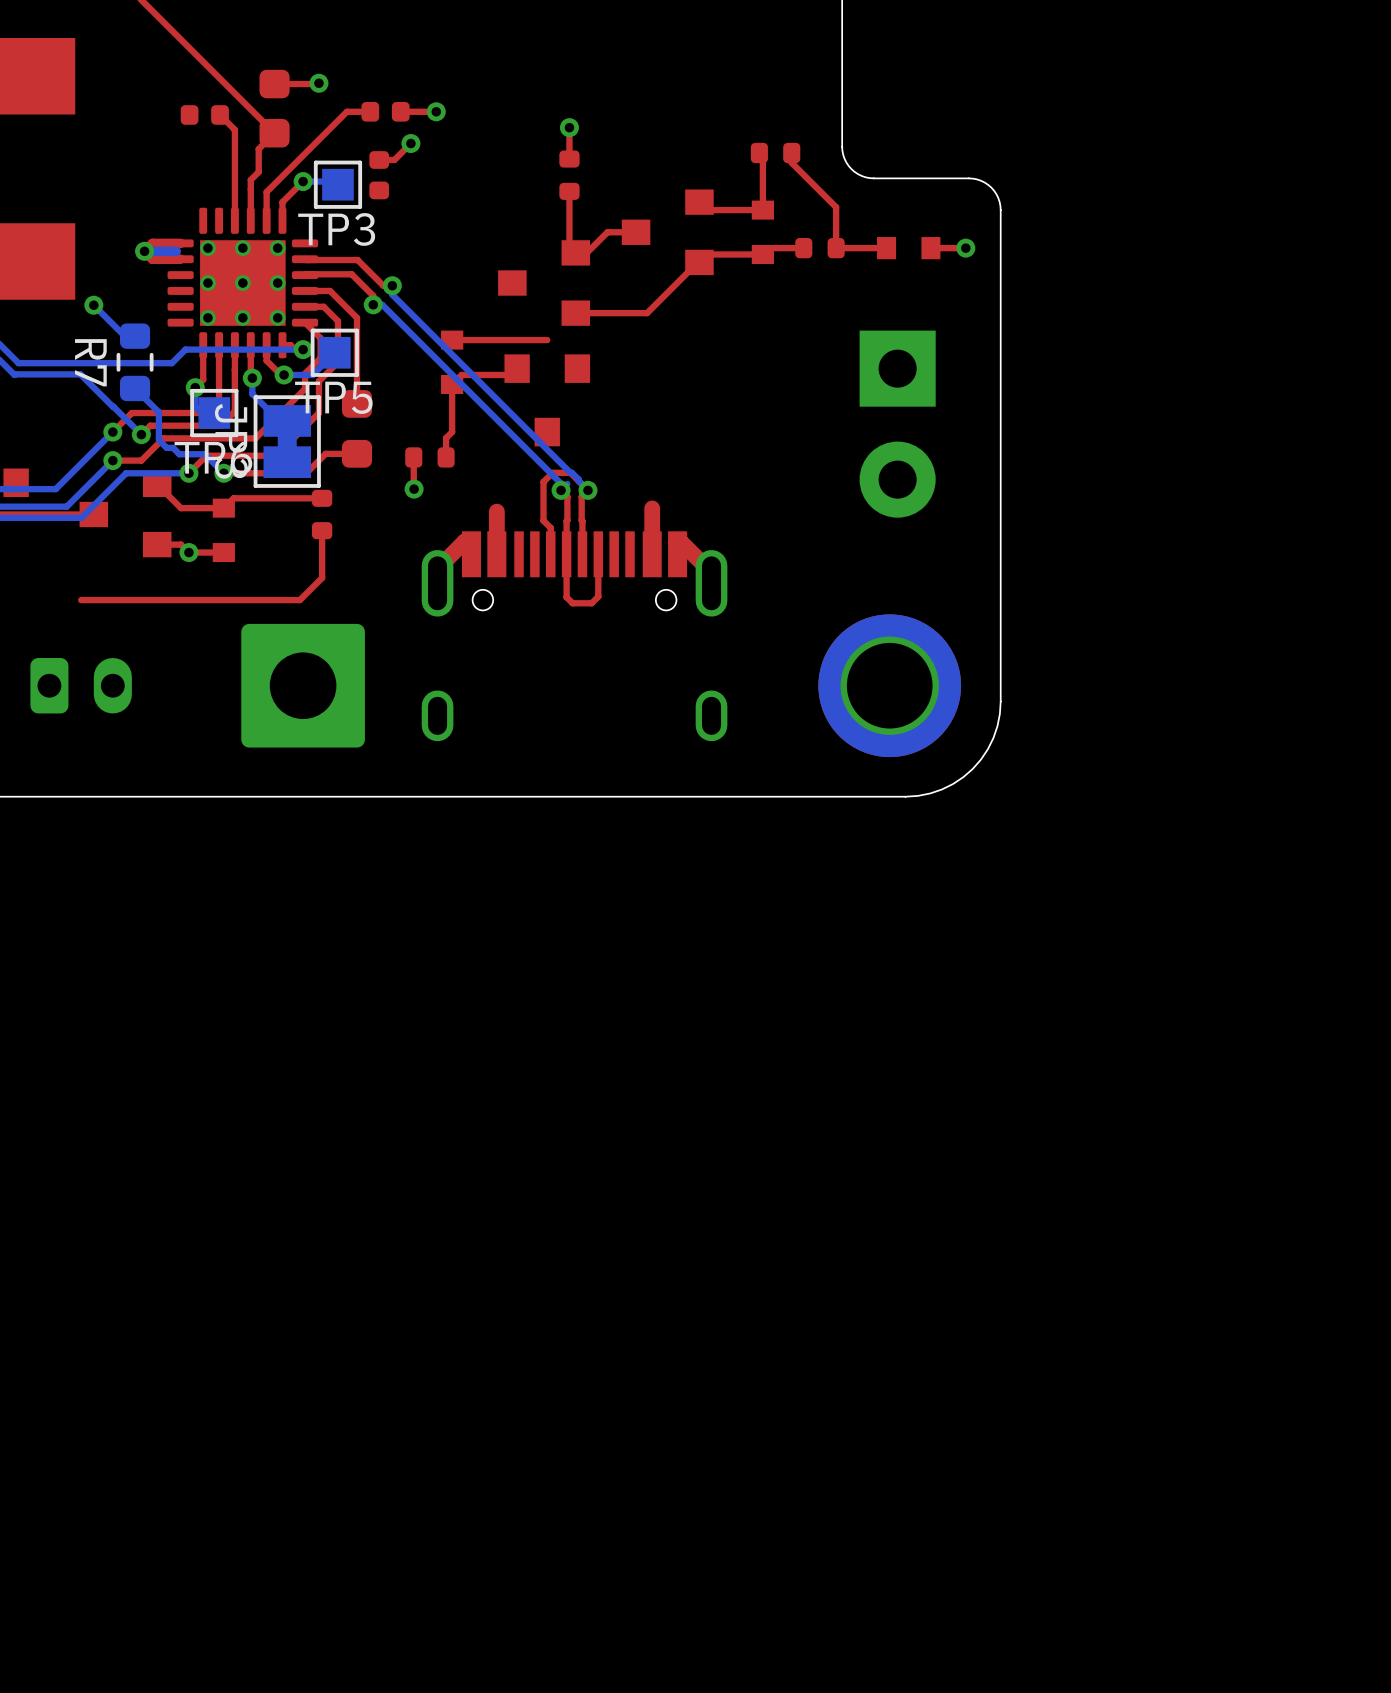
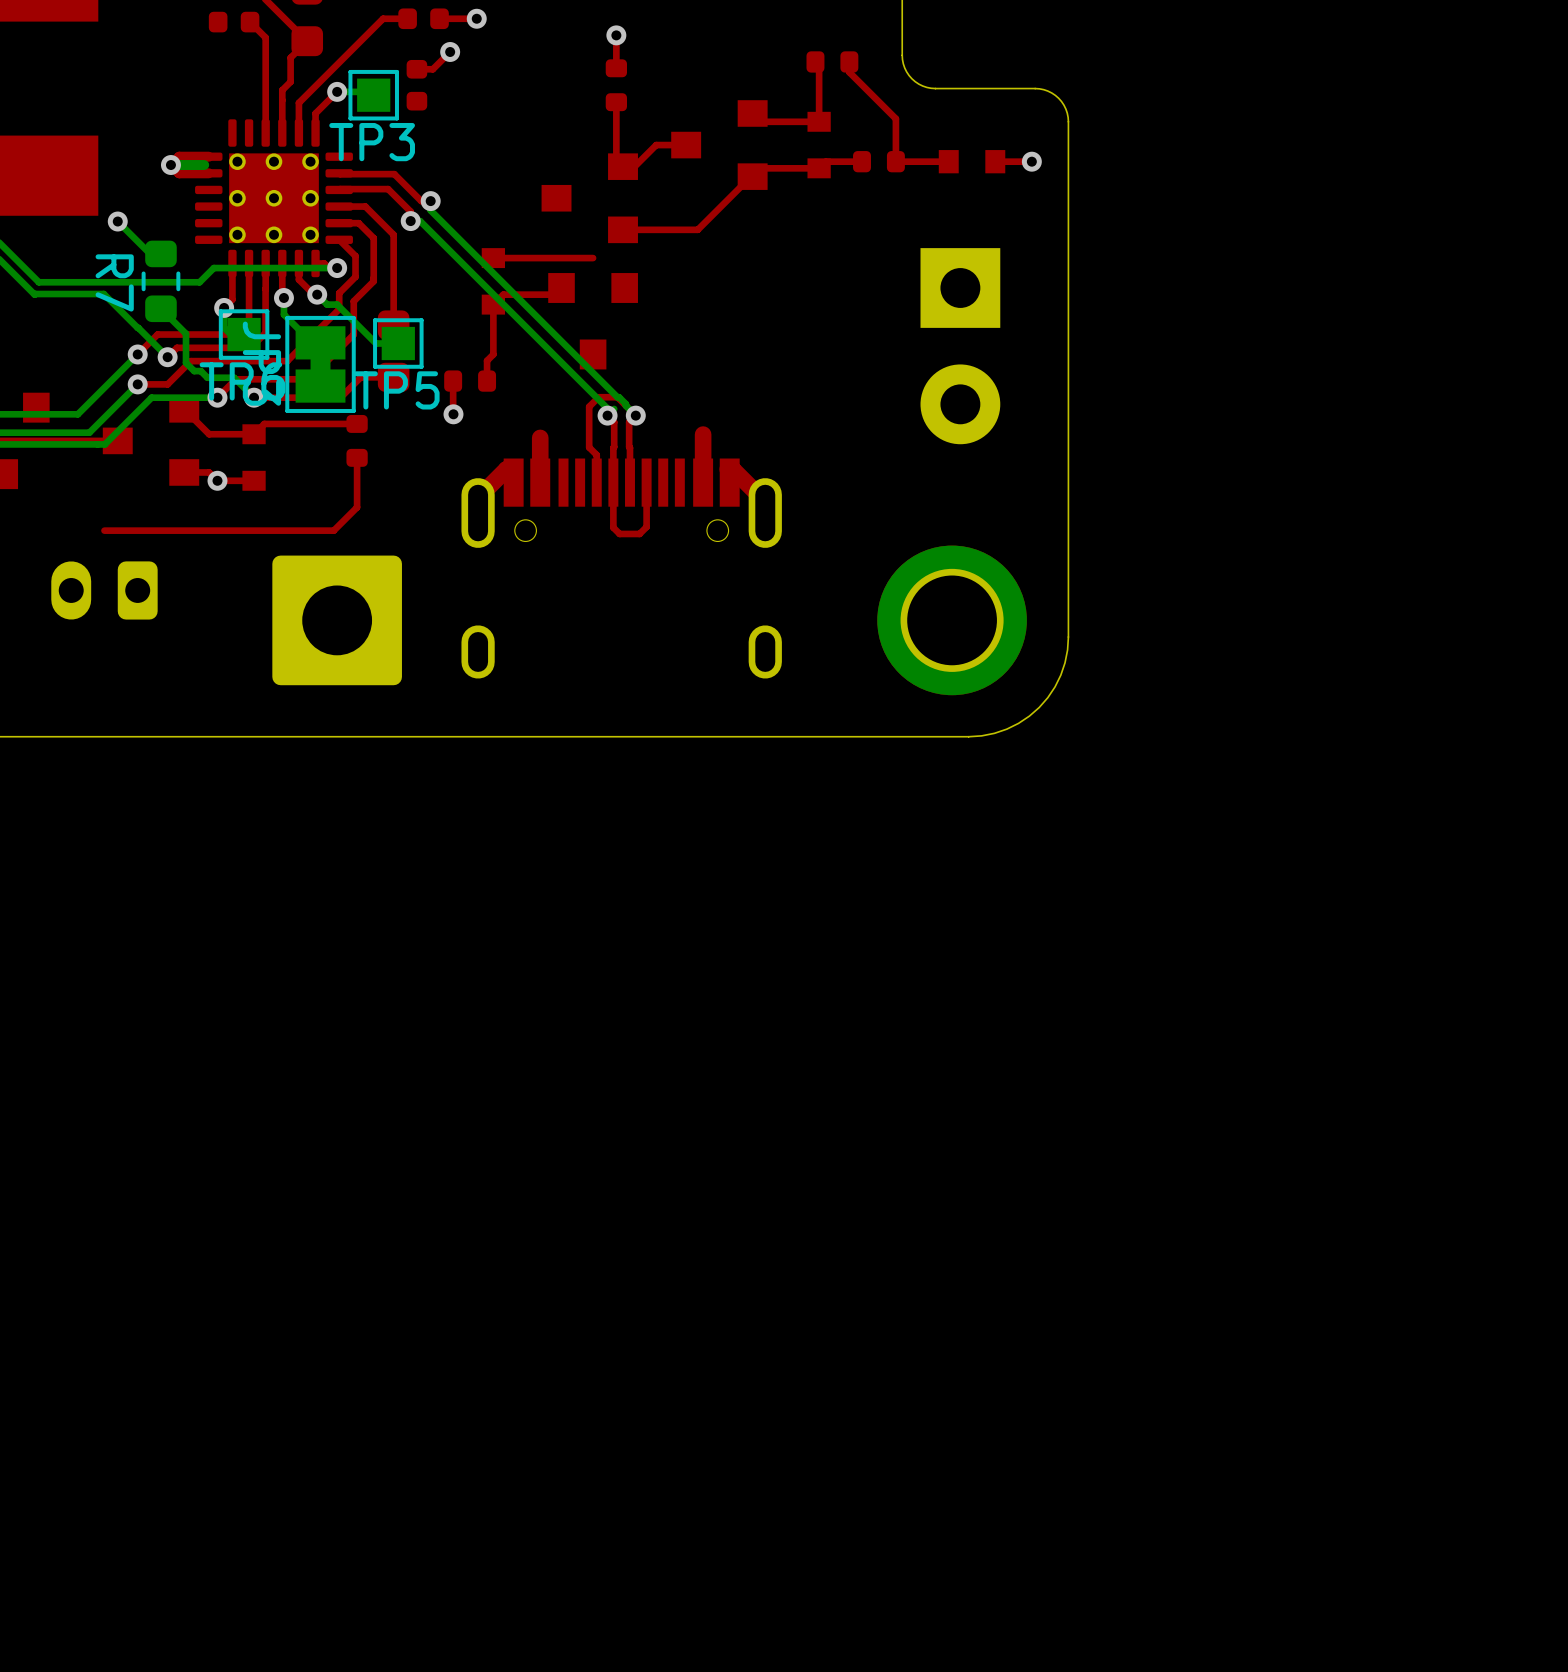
TP5 position: (334, 352) -> (398, 343)
bottom track: (325, 362) (312, 374) (284, 374) -> (398, 343) (376, 343) (337, 304) (327, 304) (317, 294)
part rotation: 0° (81, 685) -> 180° (104, 590)

